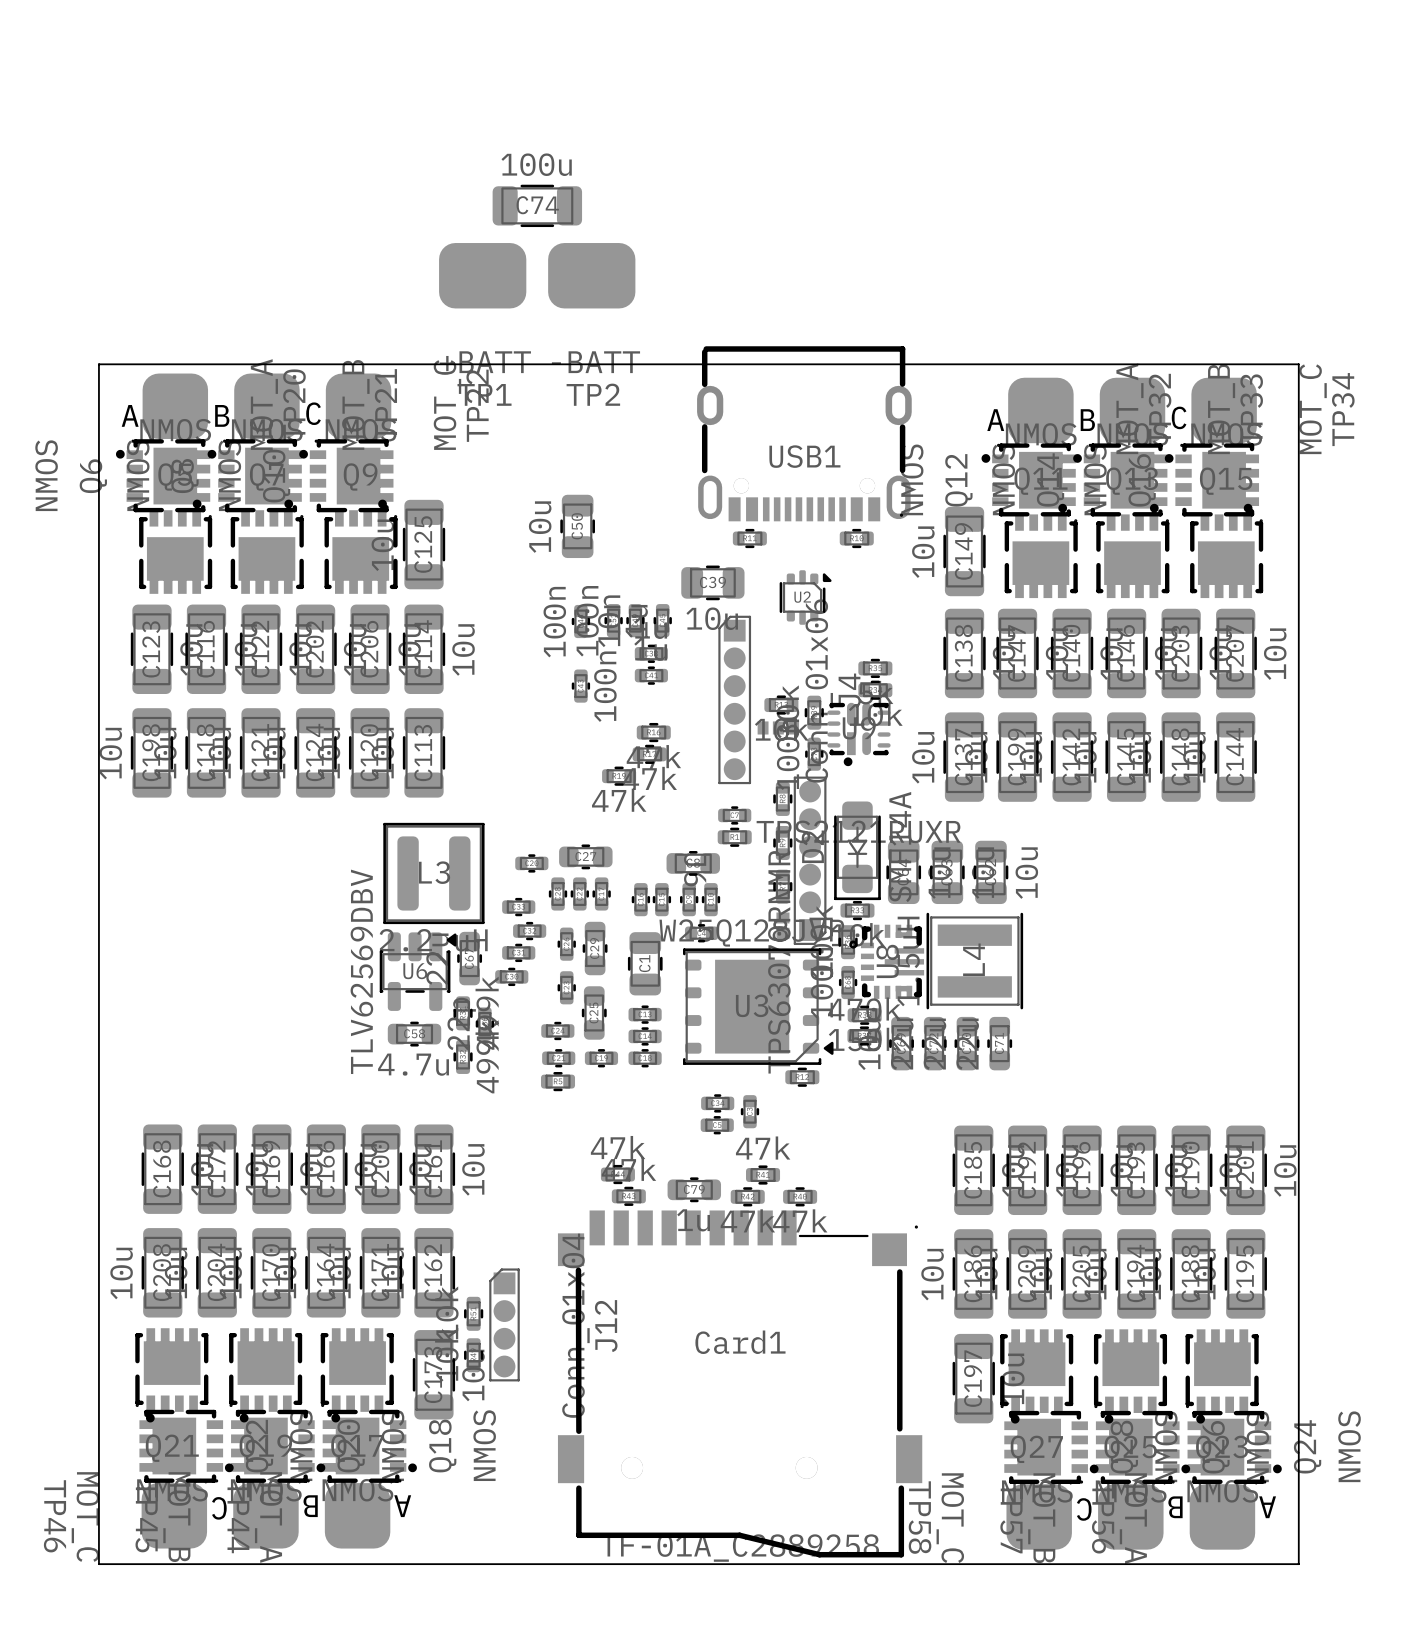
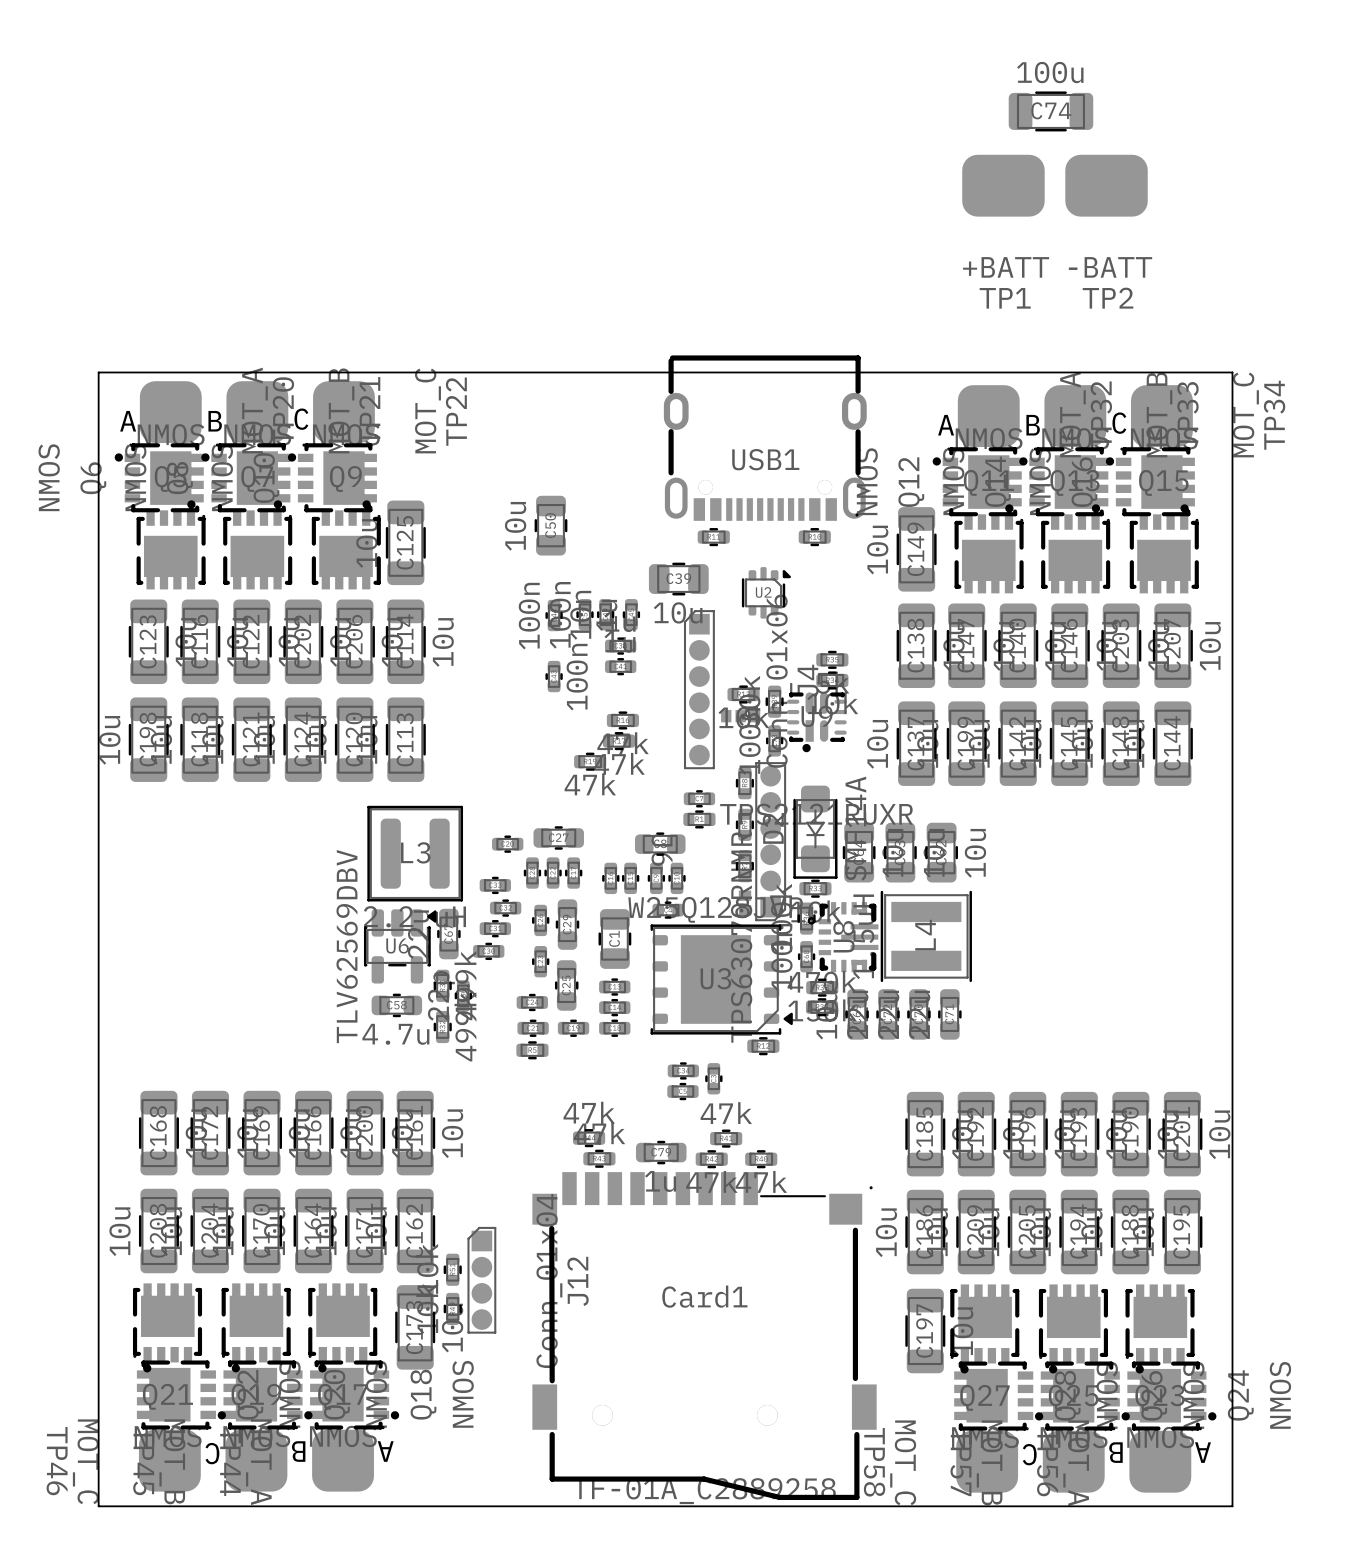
C74 position: (537, 205) -> (1050, 111)
TP1 position: (482, 275) -> (1003, 185)
TP2 position: (591, 275) -> (1106, 185)

